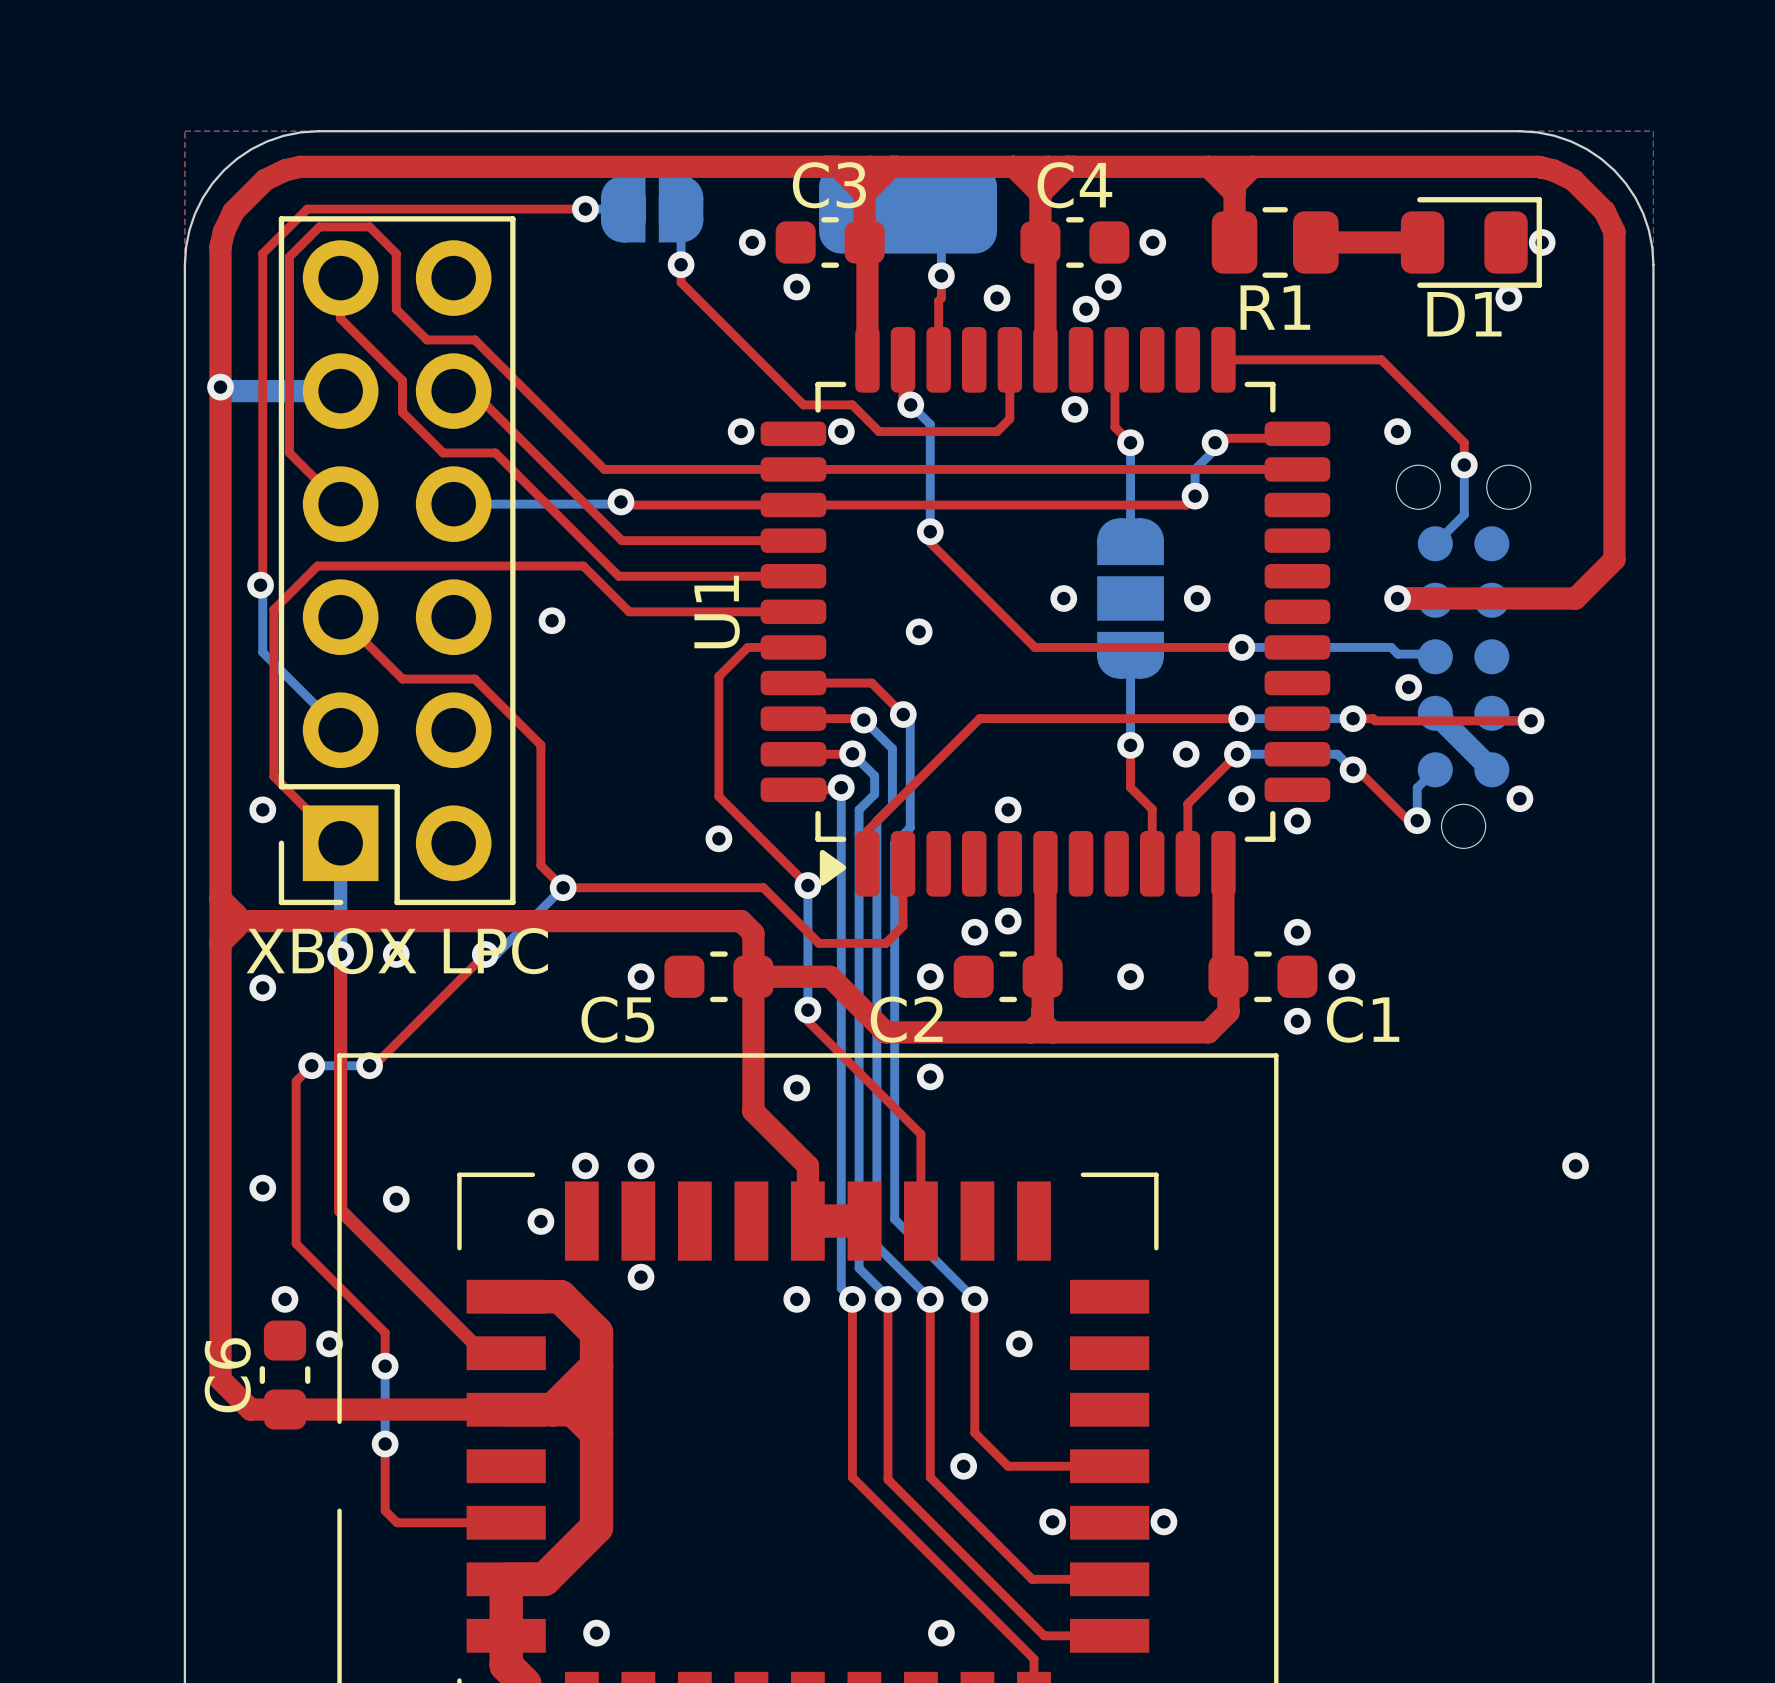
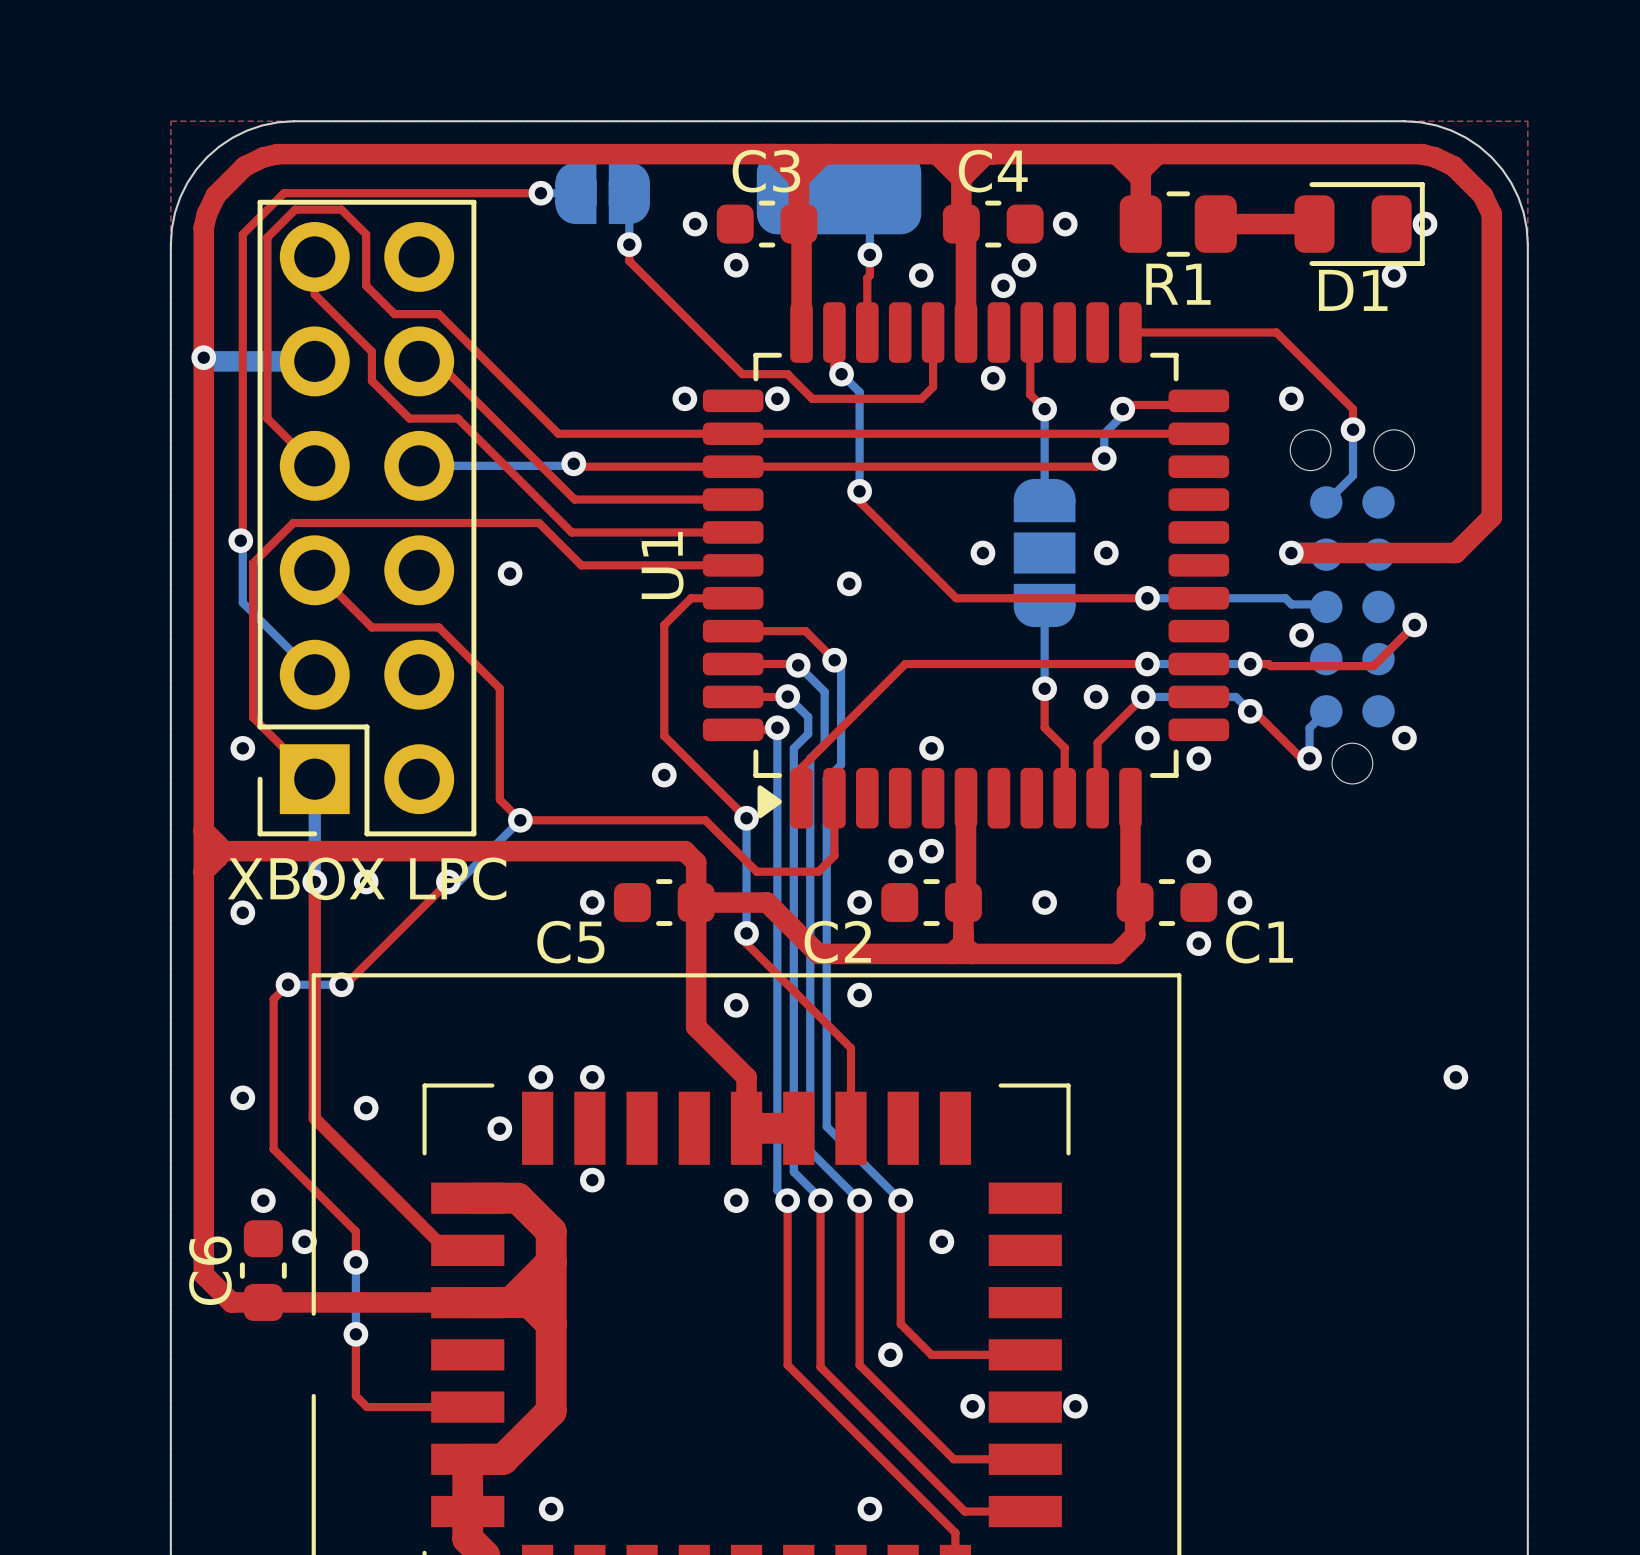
bottom track: (1435, 713) (1491, 769) -> none
top track: (1486, 720) (1531, 720) -> (1373, 666) (1414, 624)
via position: (1531, 720) -> (1414, 624)

